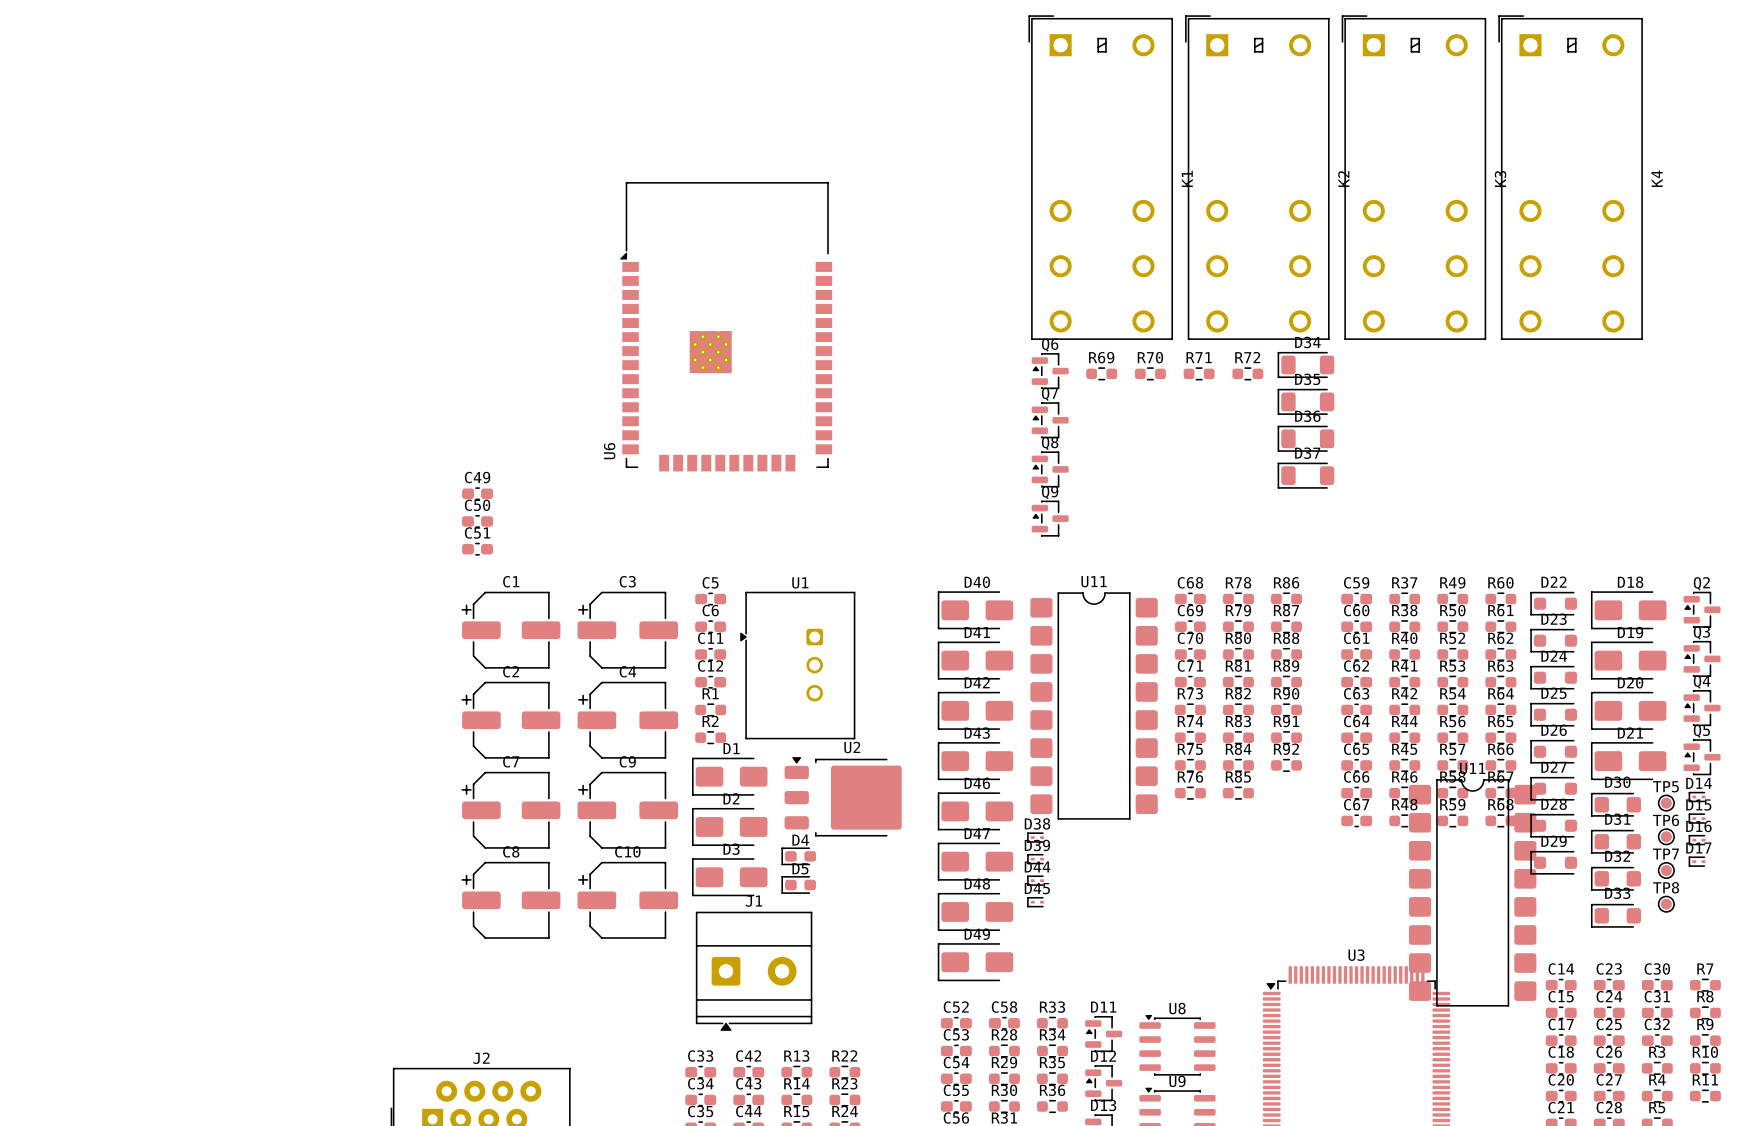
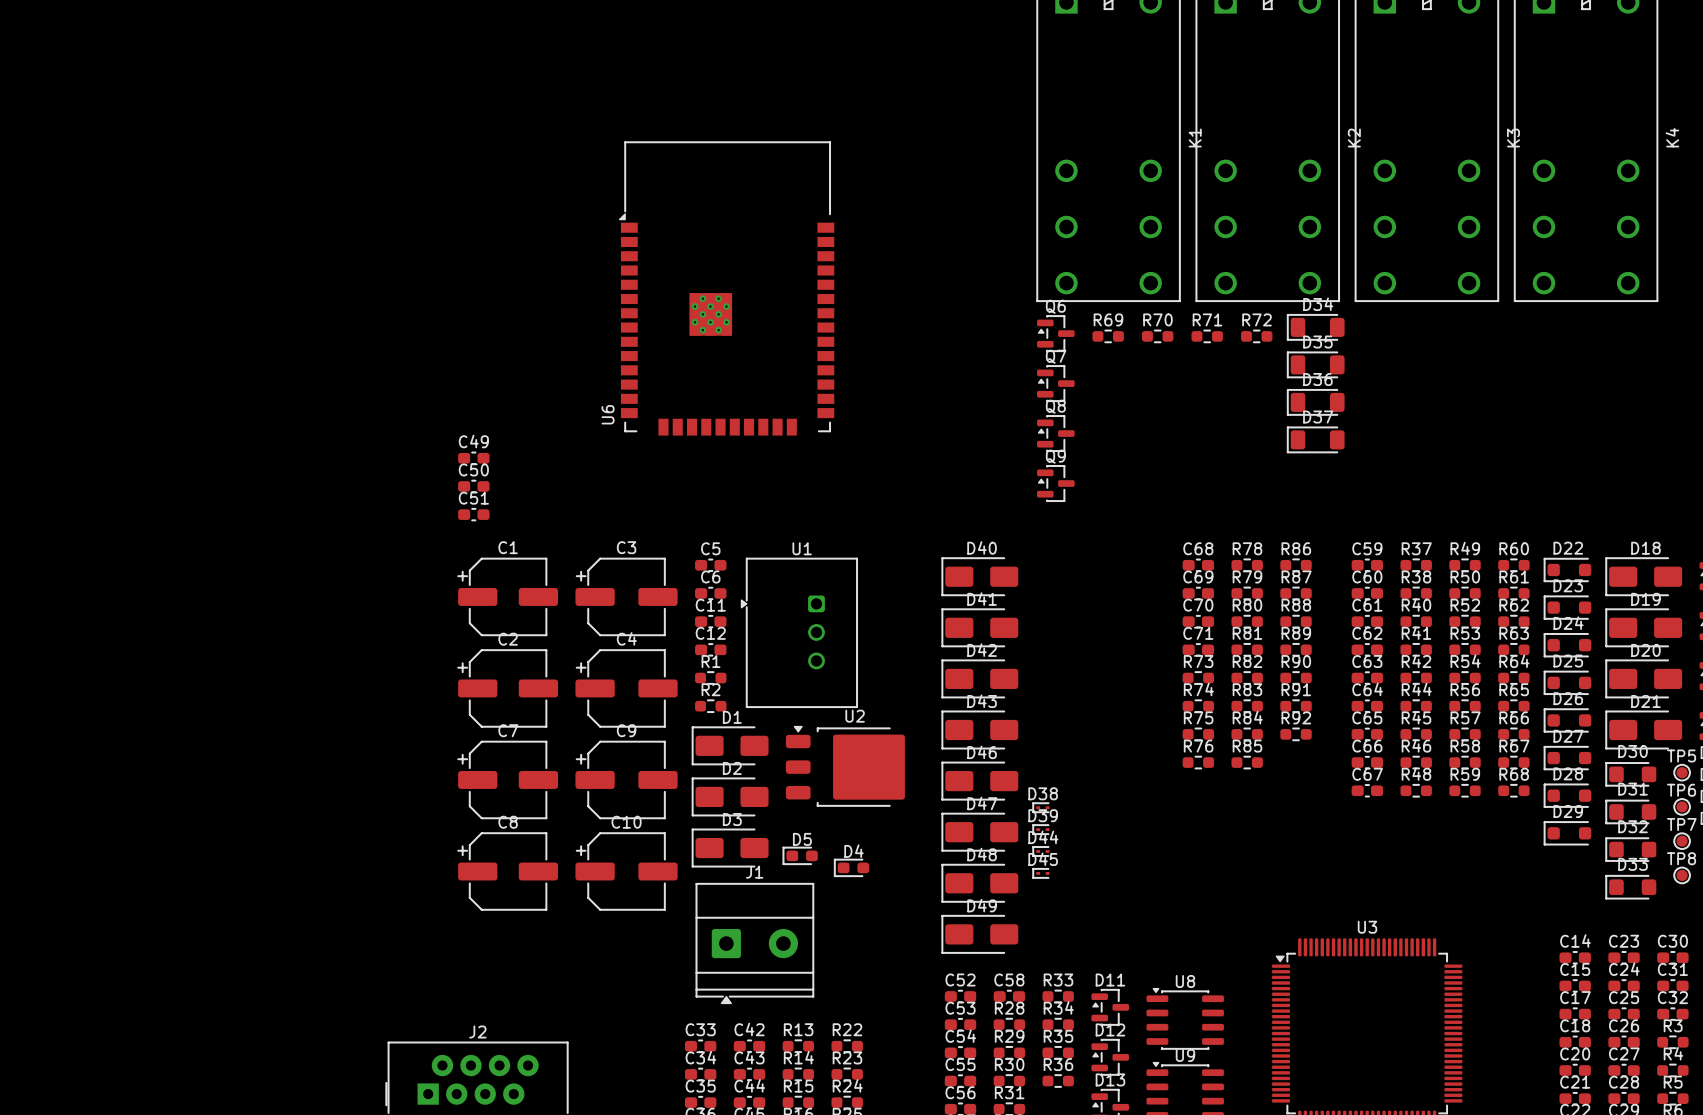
U11: (1094, 705) -> none
D4 position: (798, 856) -> (851, 867)
U11: (1472, 892) -> none

